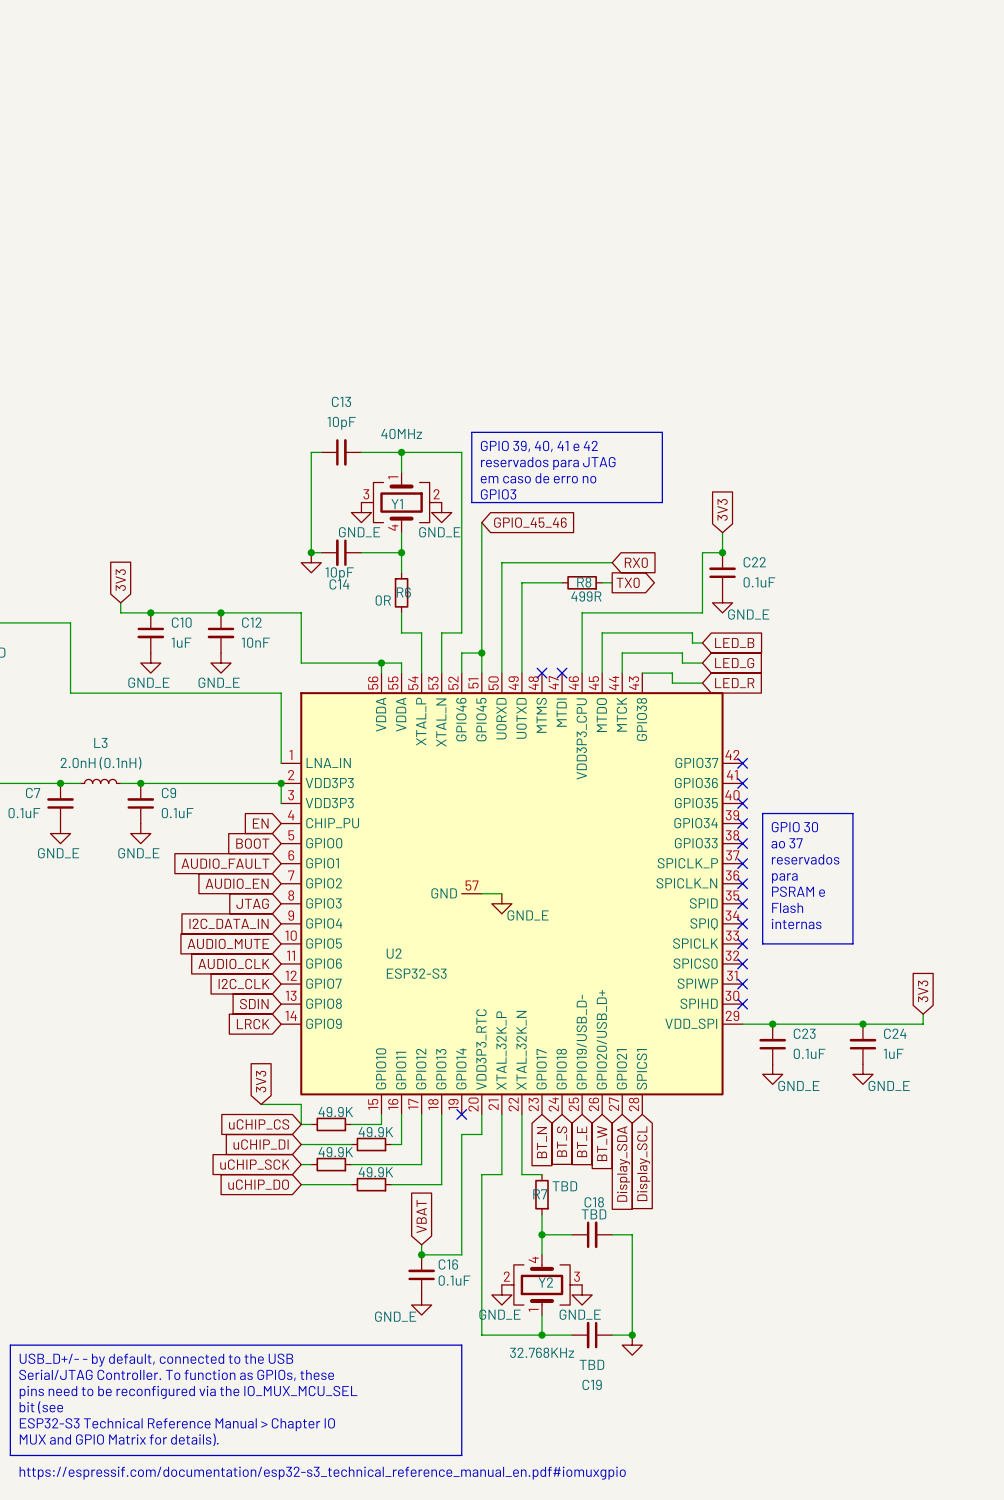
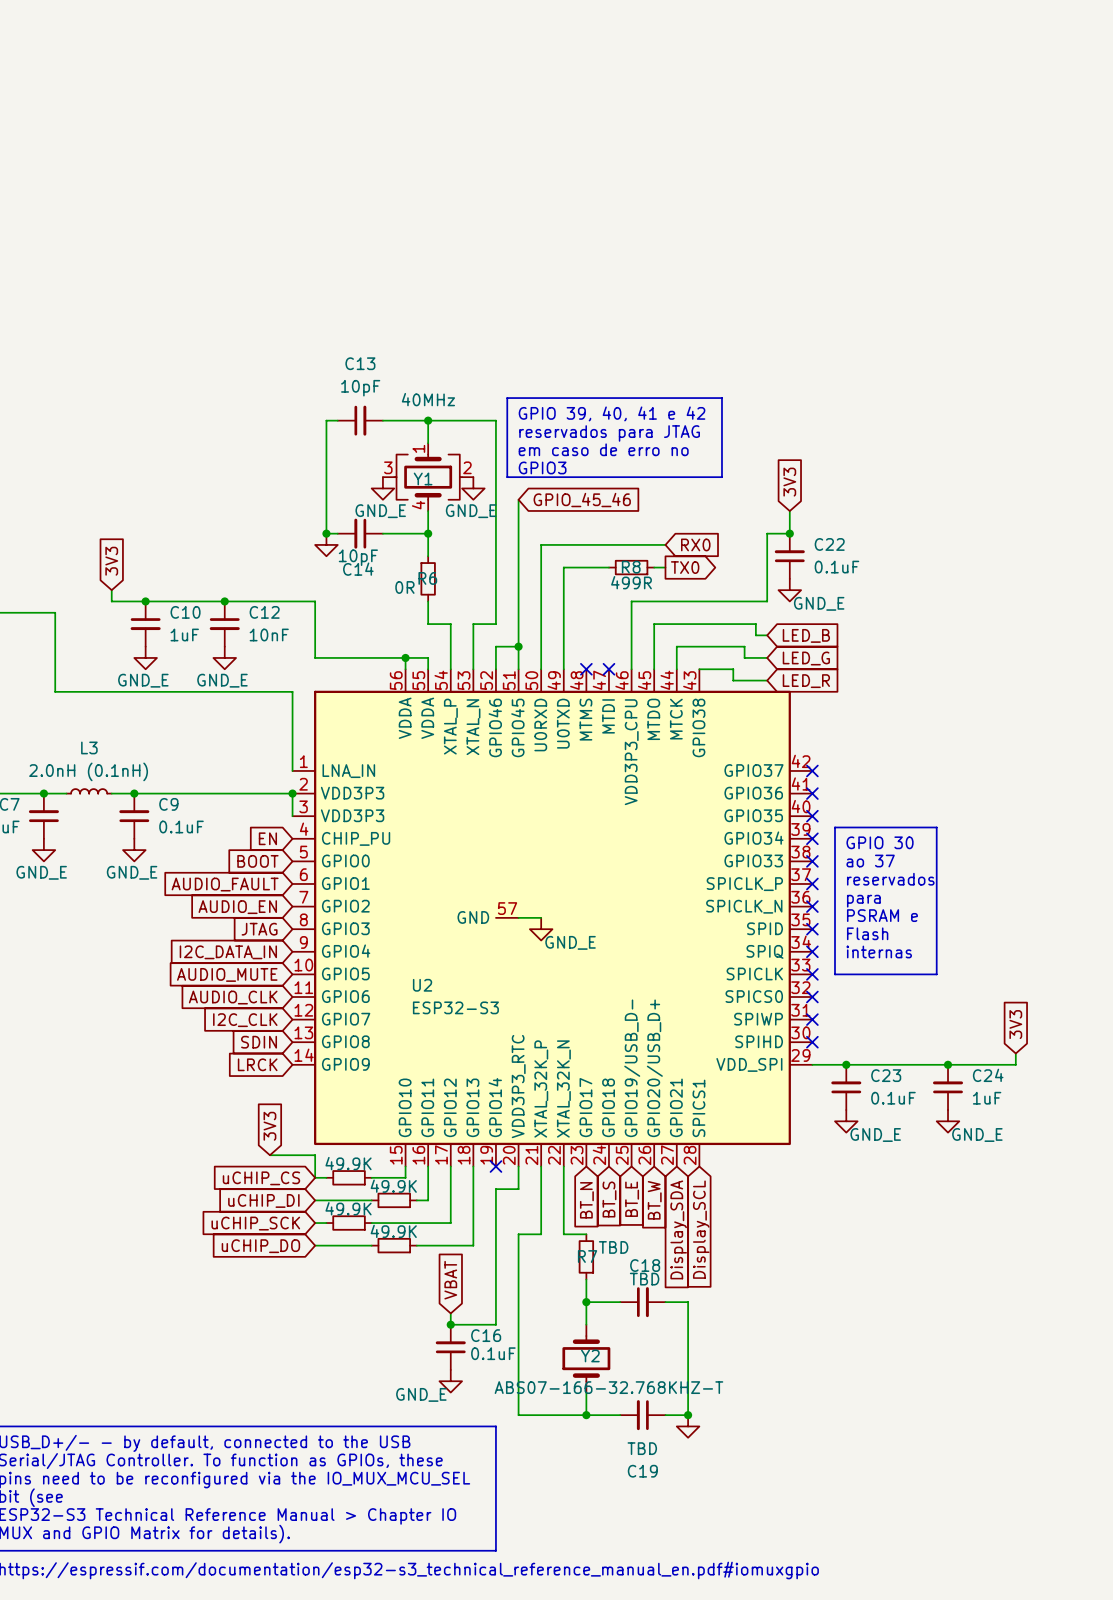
Y2 symbol: [501, 1254, 583, 1316] -> [562, 1324, 611, 1393]
power symbol: GND_E (501, 1294) -> none
power symbol: GND_E (582, 1294) -> none
Y2 value: 32.768KHz (542, 1352) -> ABS07-166-32.768KHZ-T (608, 1387)

